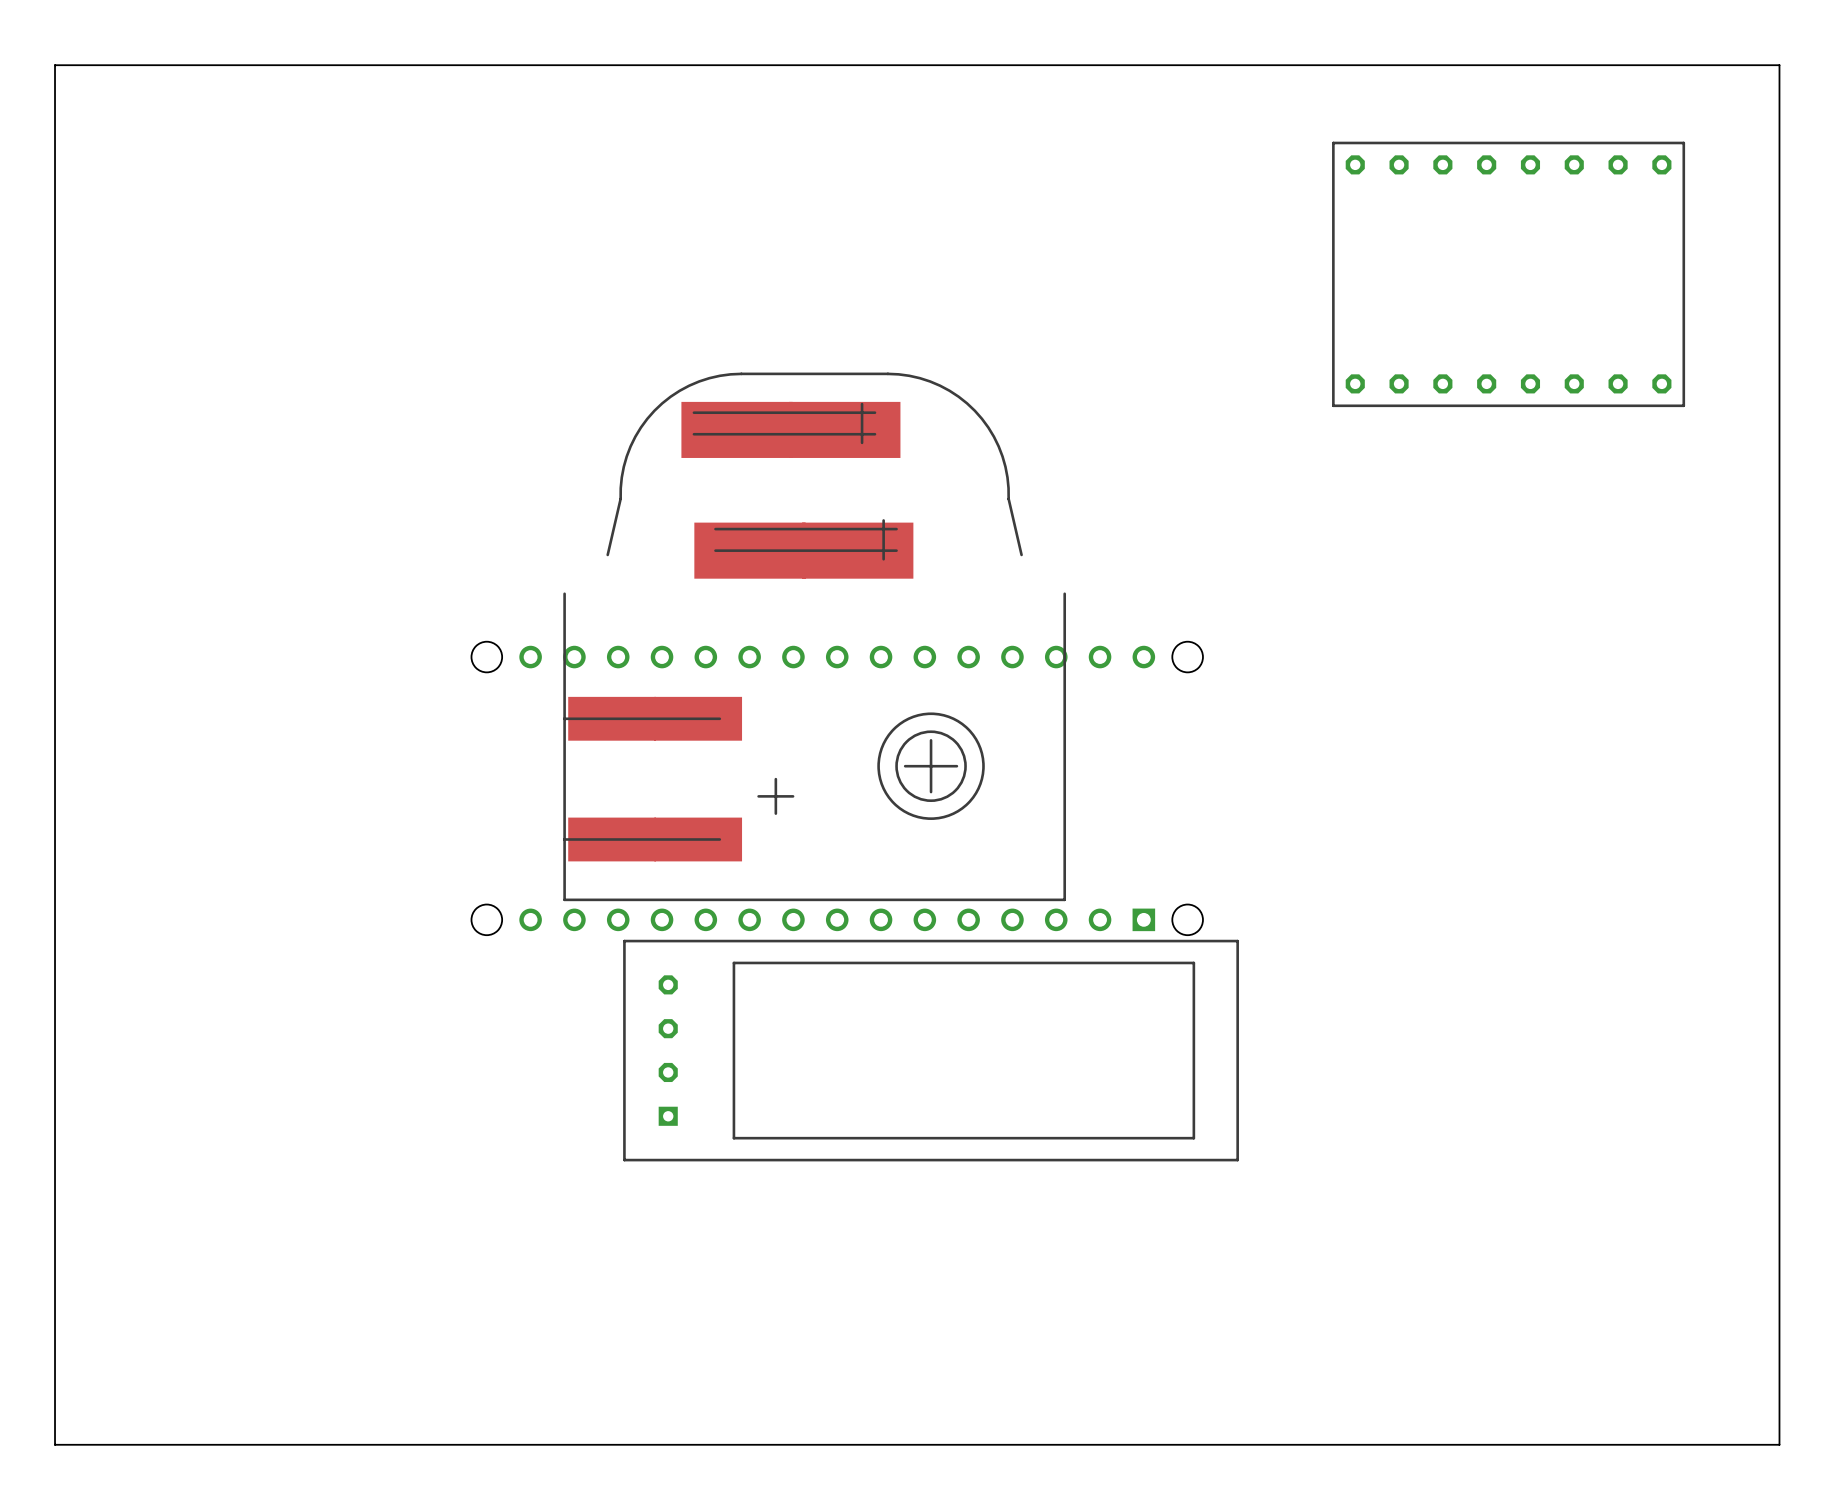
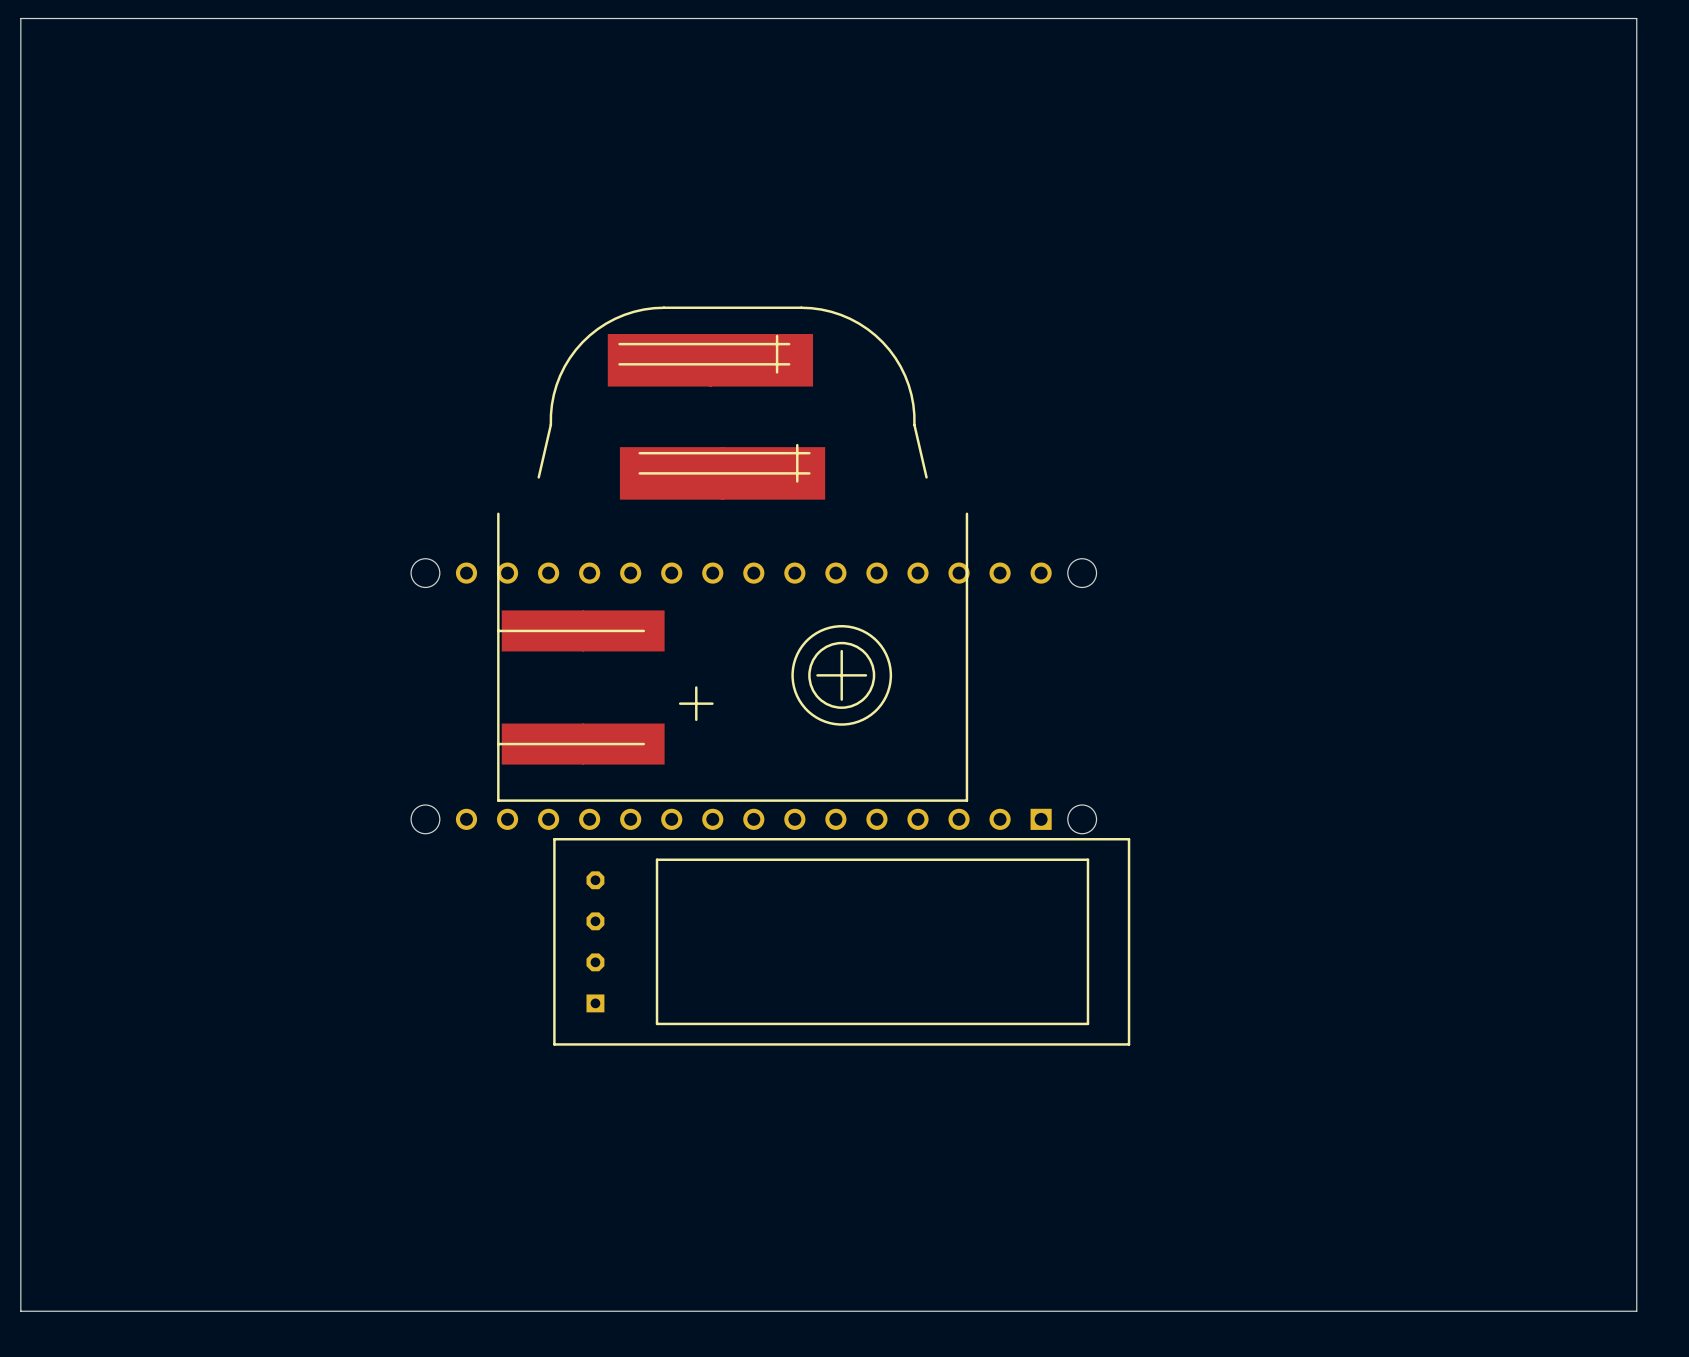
part: (1508, 274) -> none

